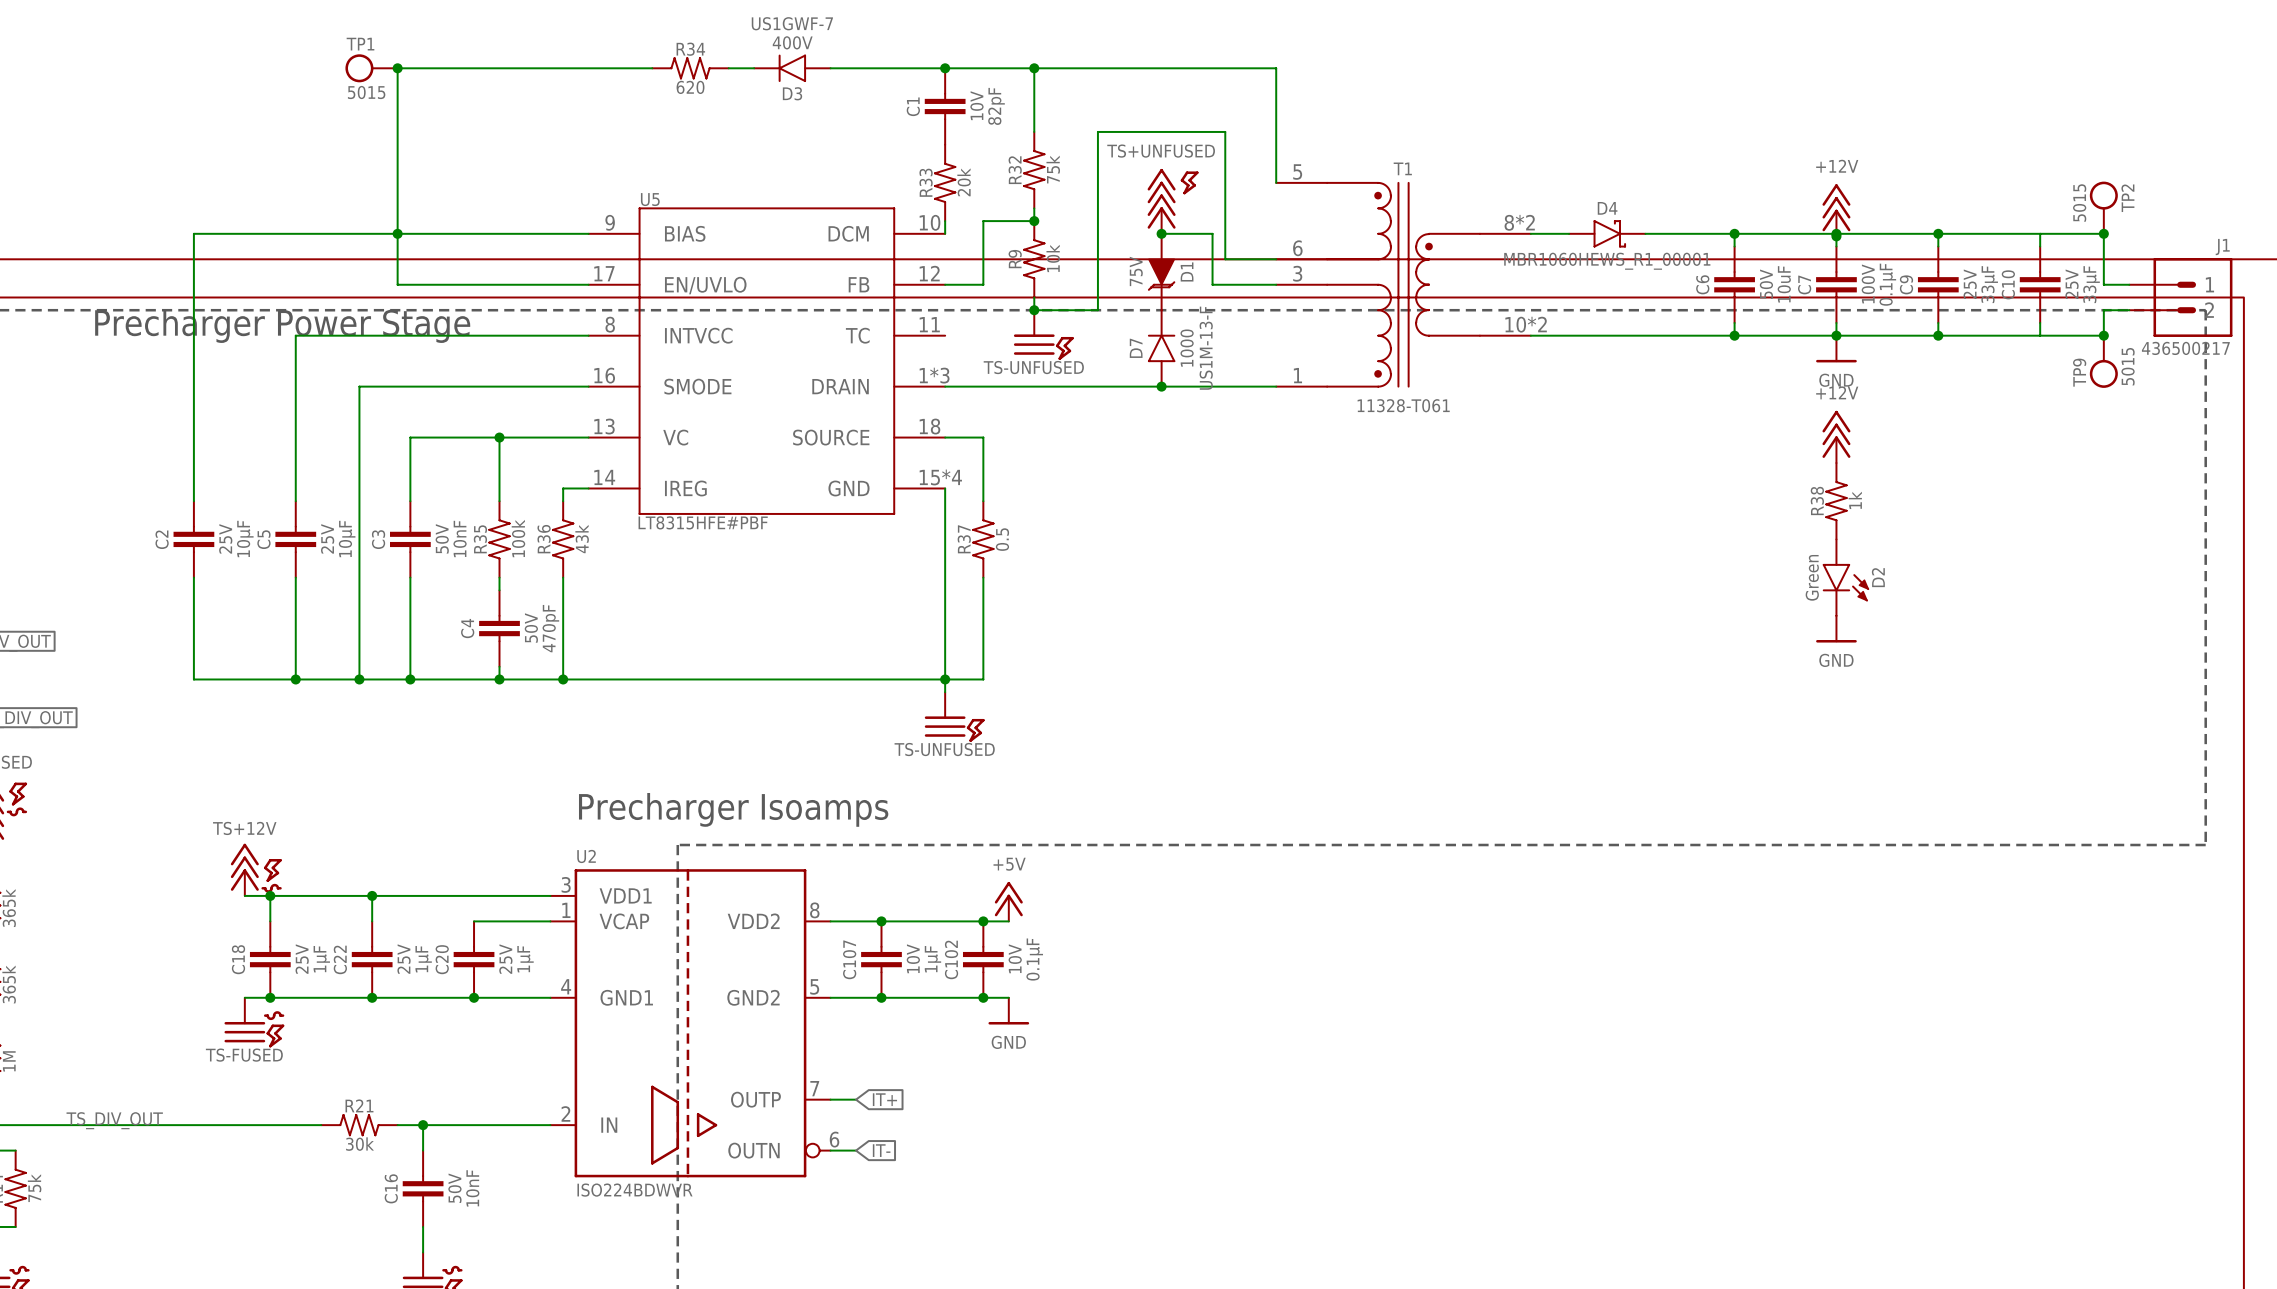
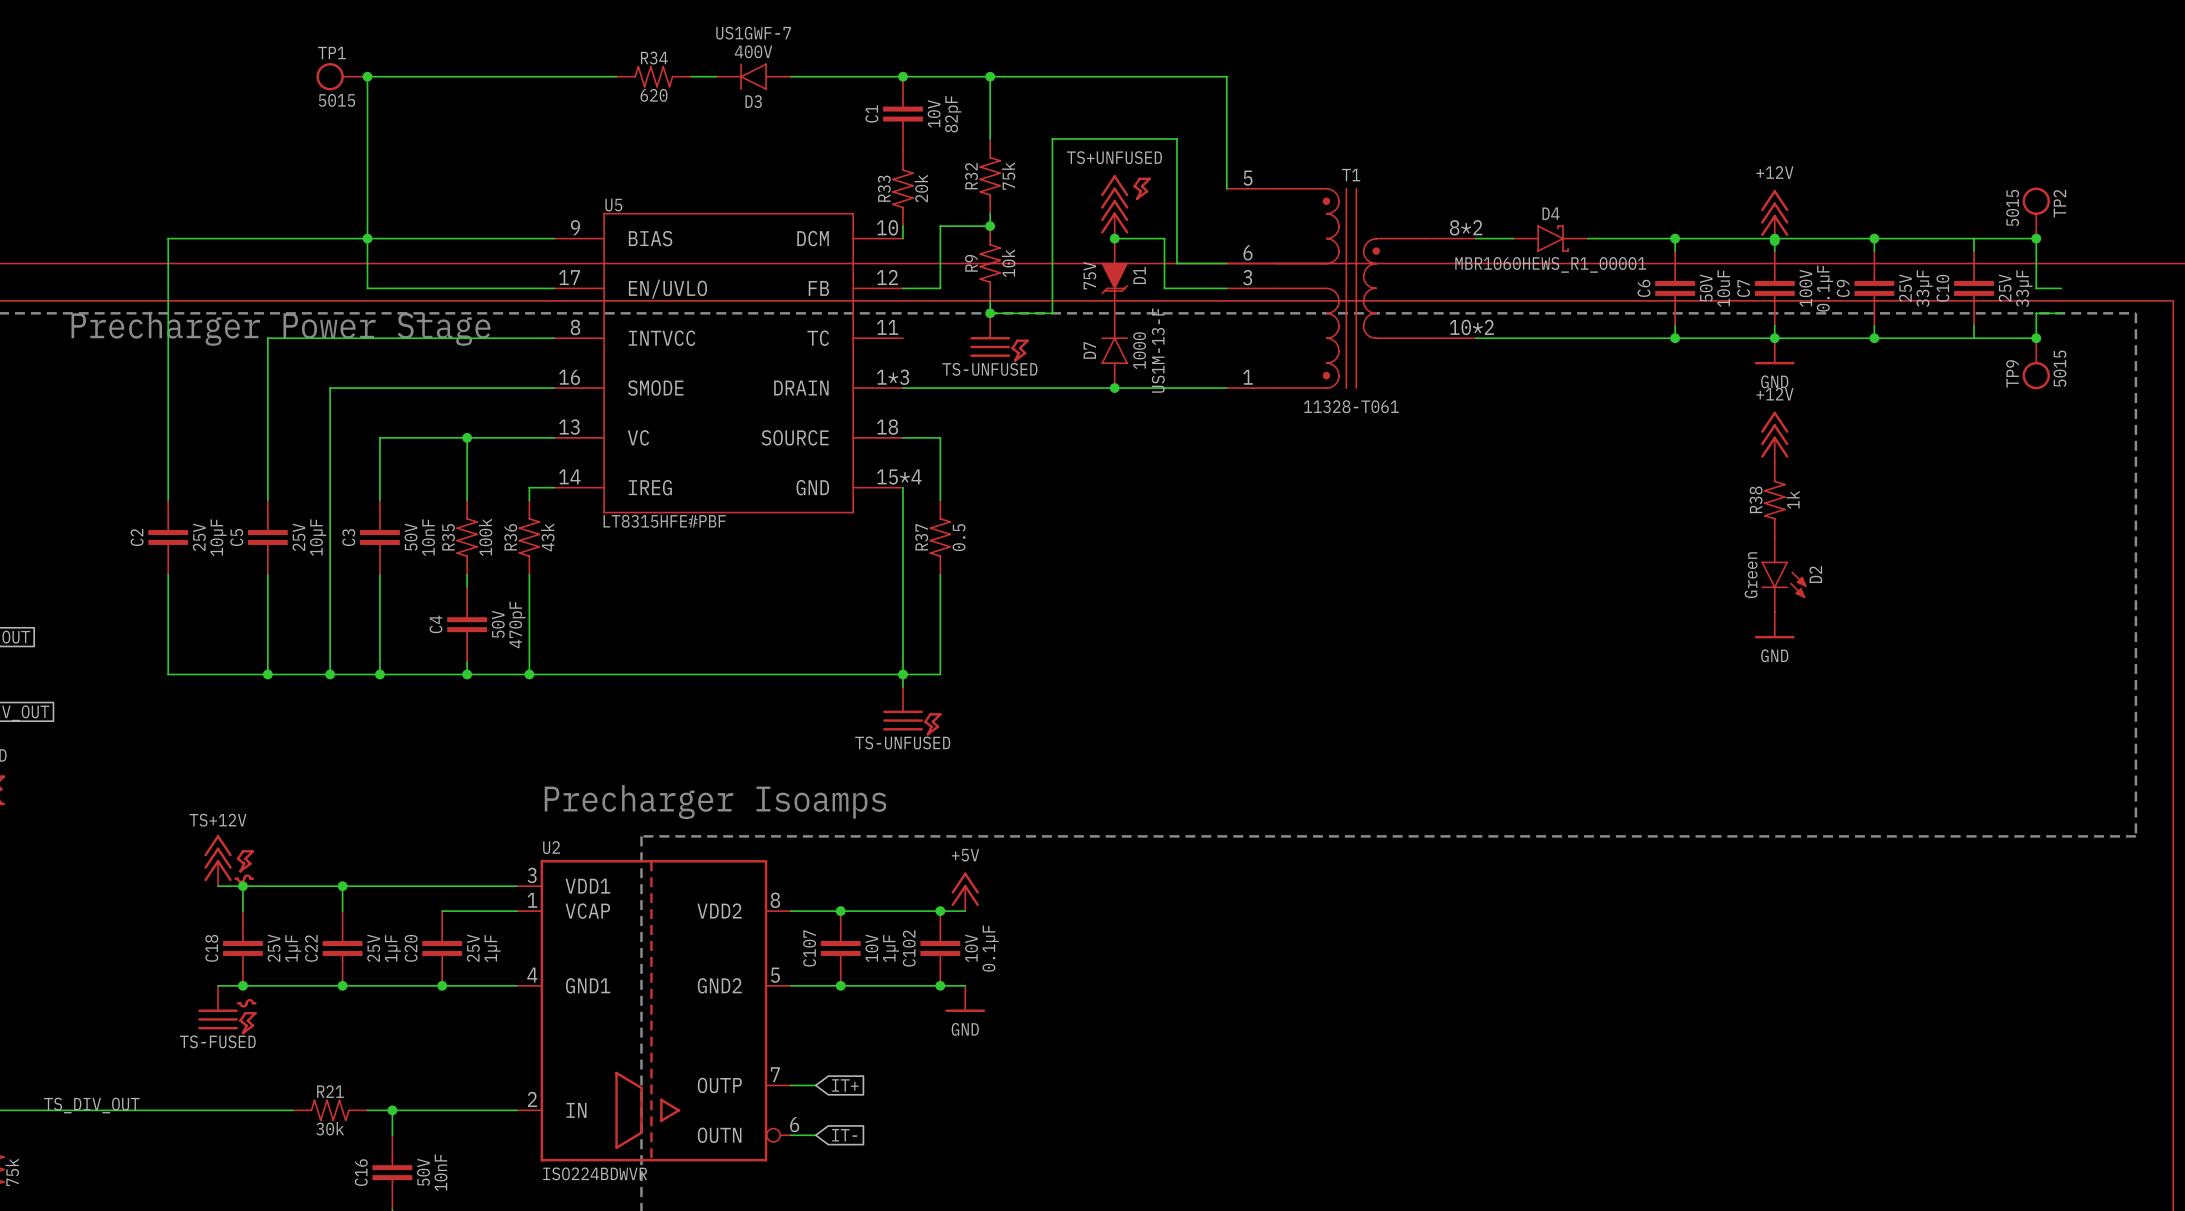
J1: (2180, 297) -> none

